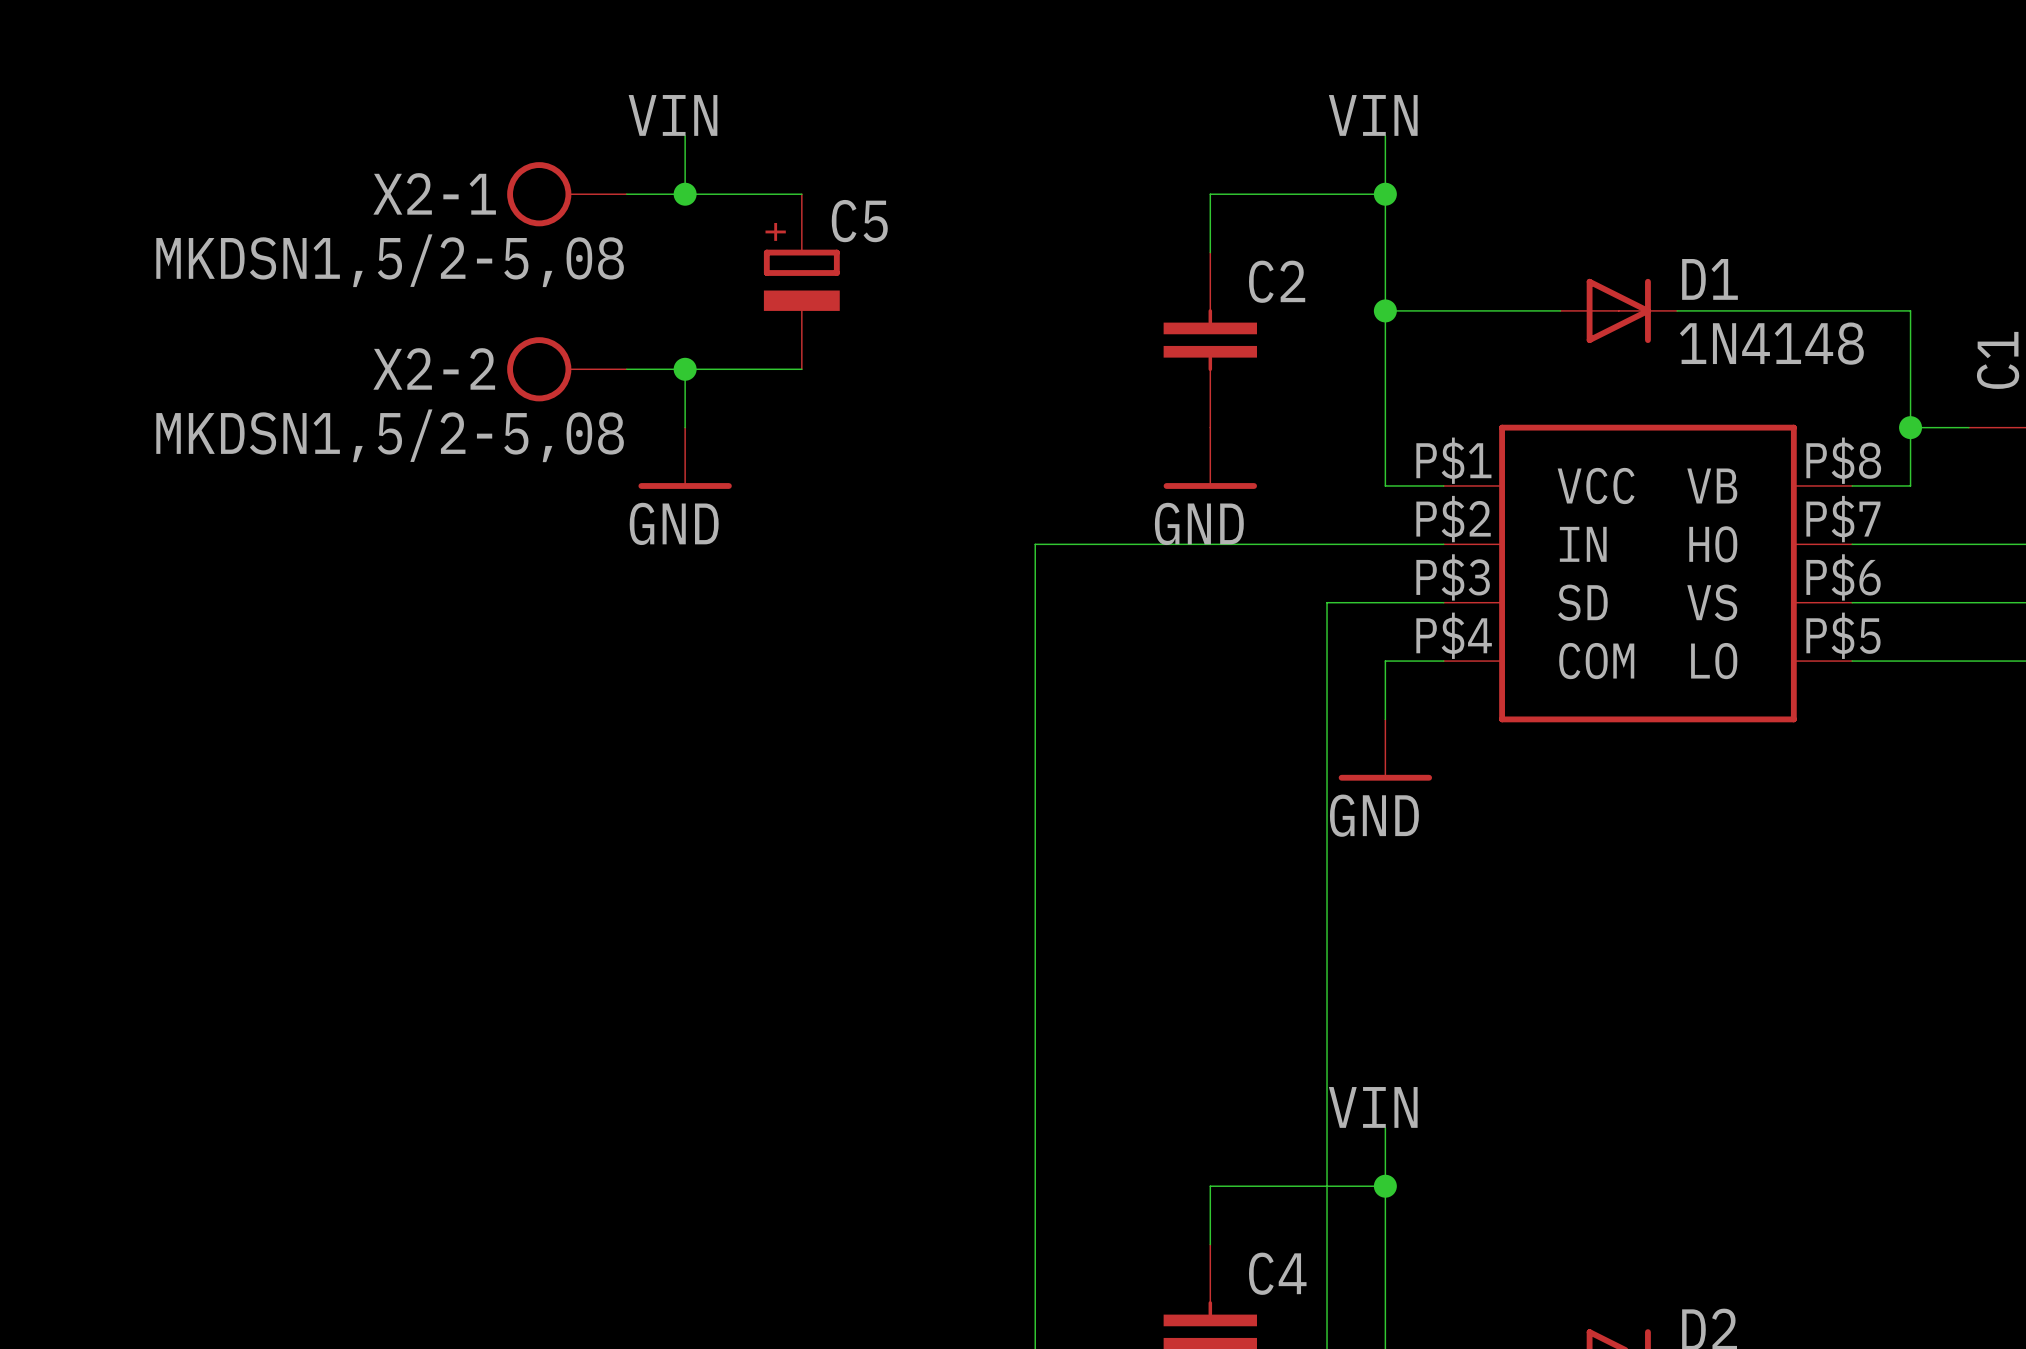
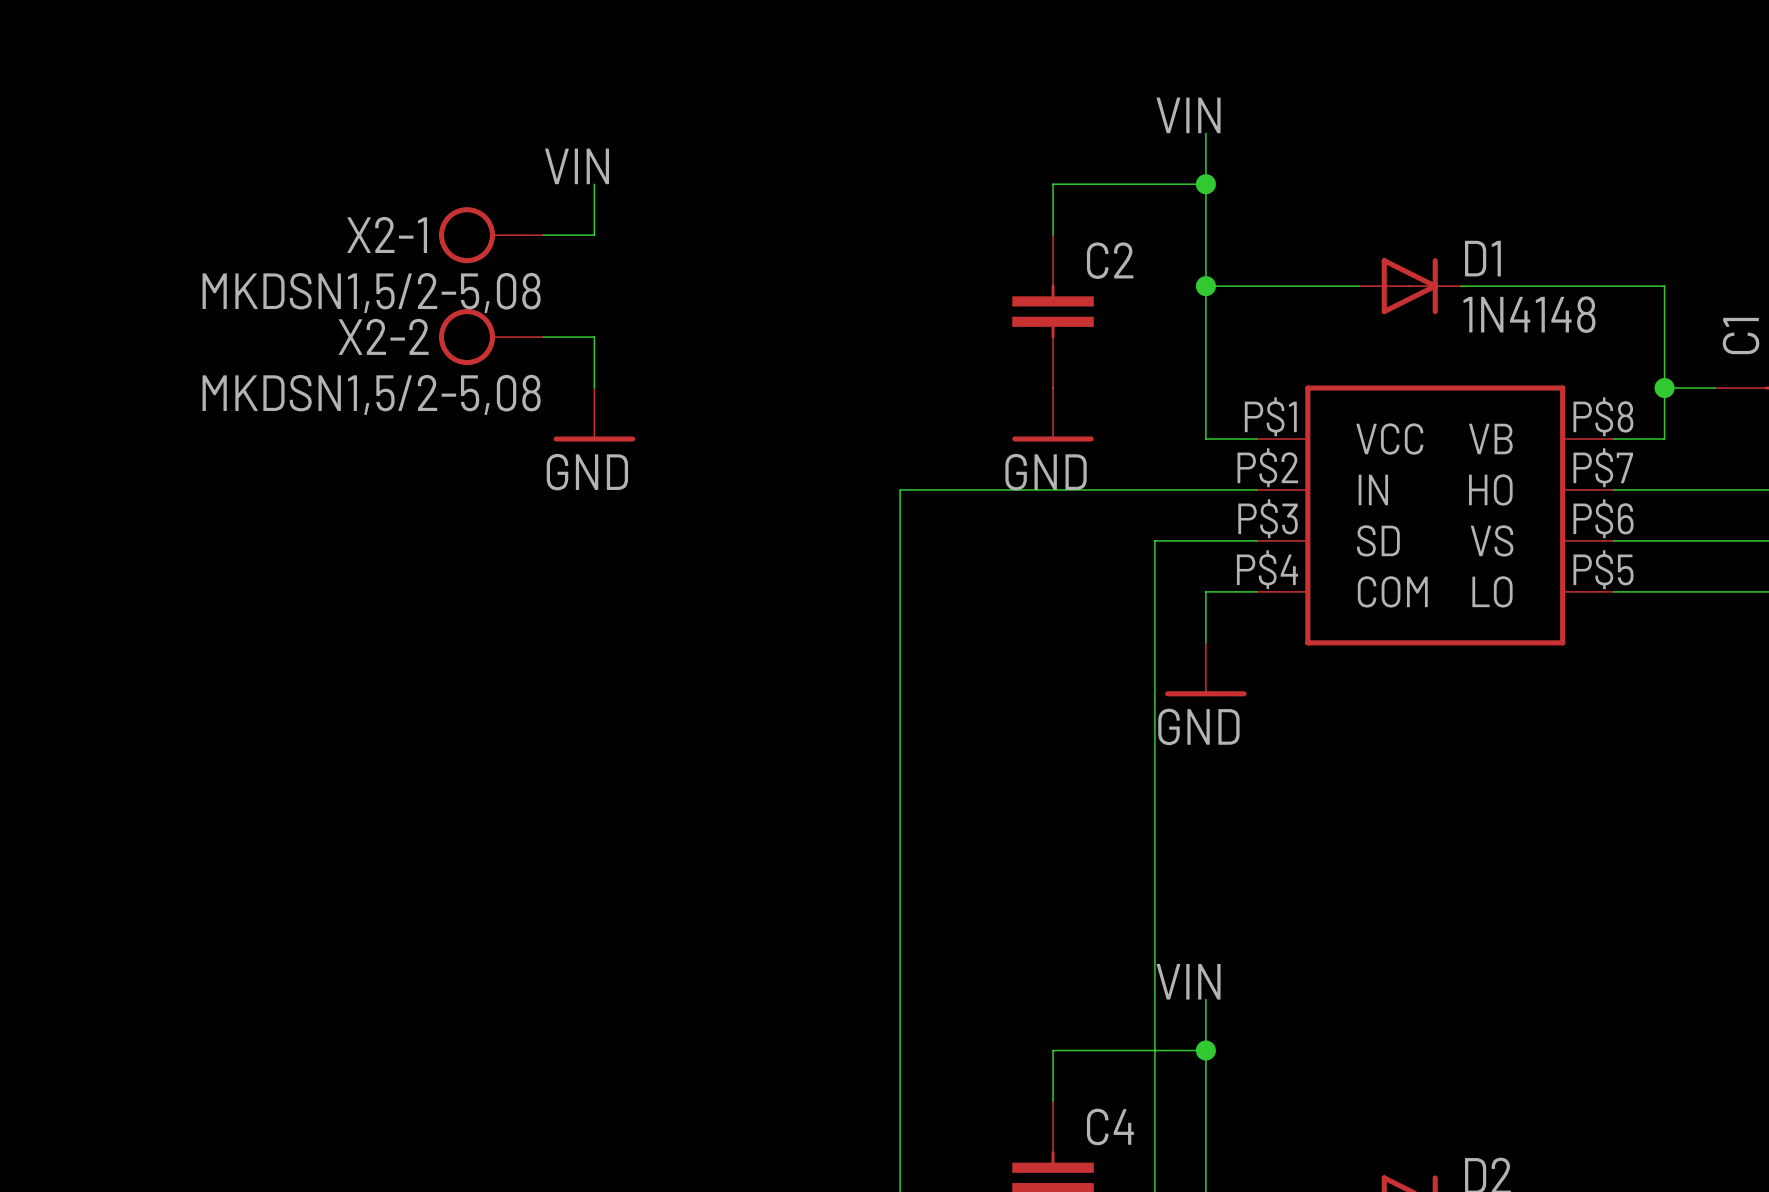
label position: VIN (673, 115) -> VIN (577, 166)
wire: (685, 135) (685, 194) -> (543, 235) (594, 235) (594, 184)
X2-1 position: (566, 194) -> (491, 235)
wire: (626, 194) (801, 194) -> none
junction: (685, 194) -> none
C5: (801, 281) -> none
wire: (685, 369) (801, 369) -> none
junction: (685, 369) -> none

